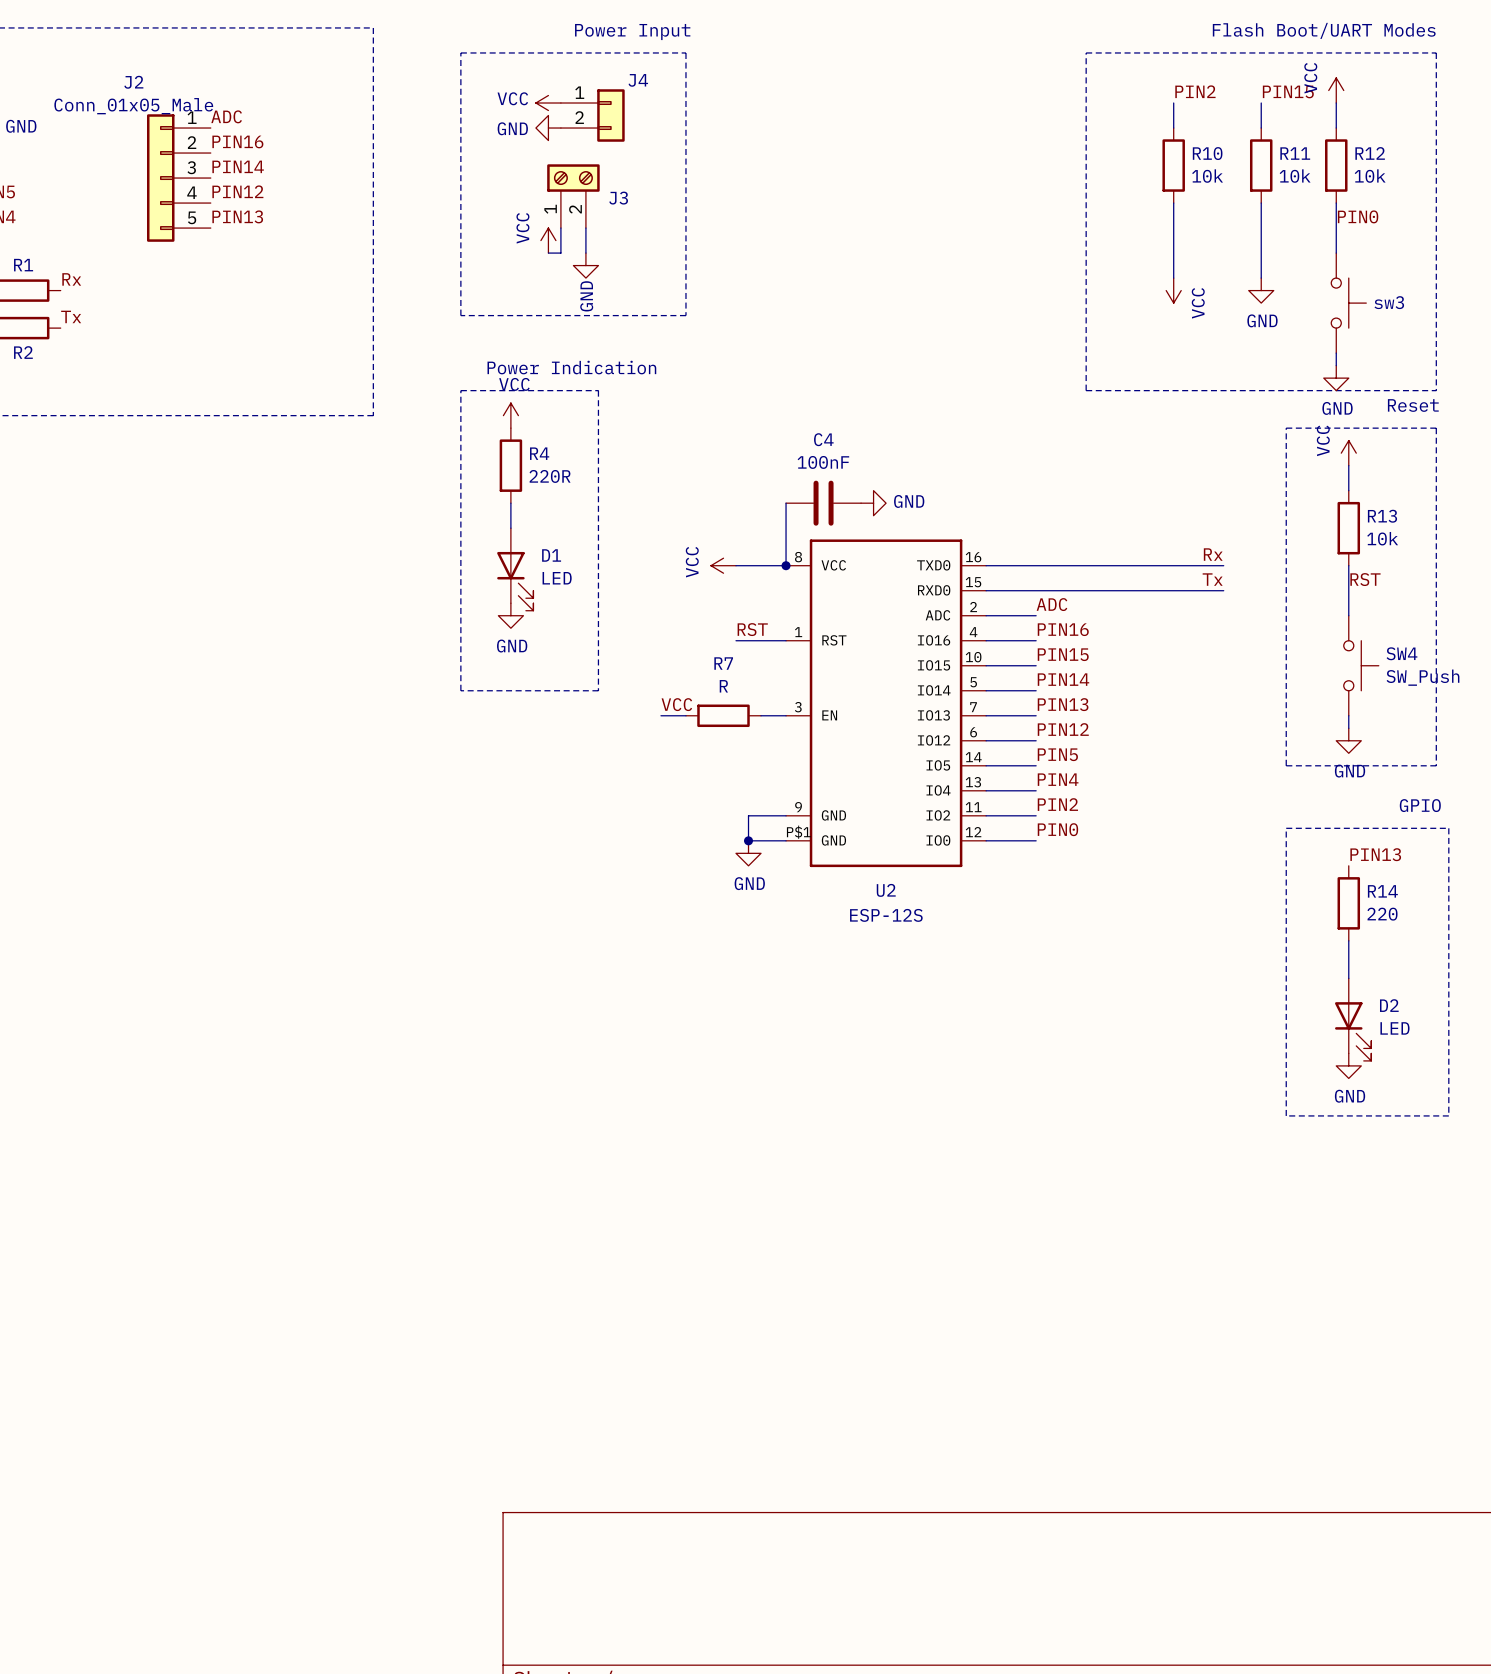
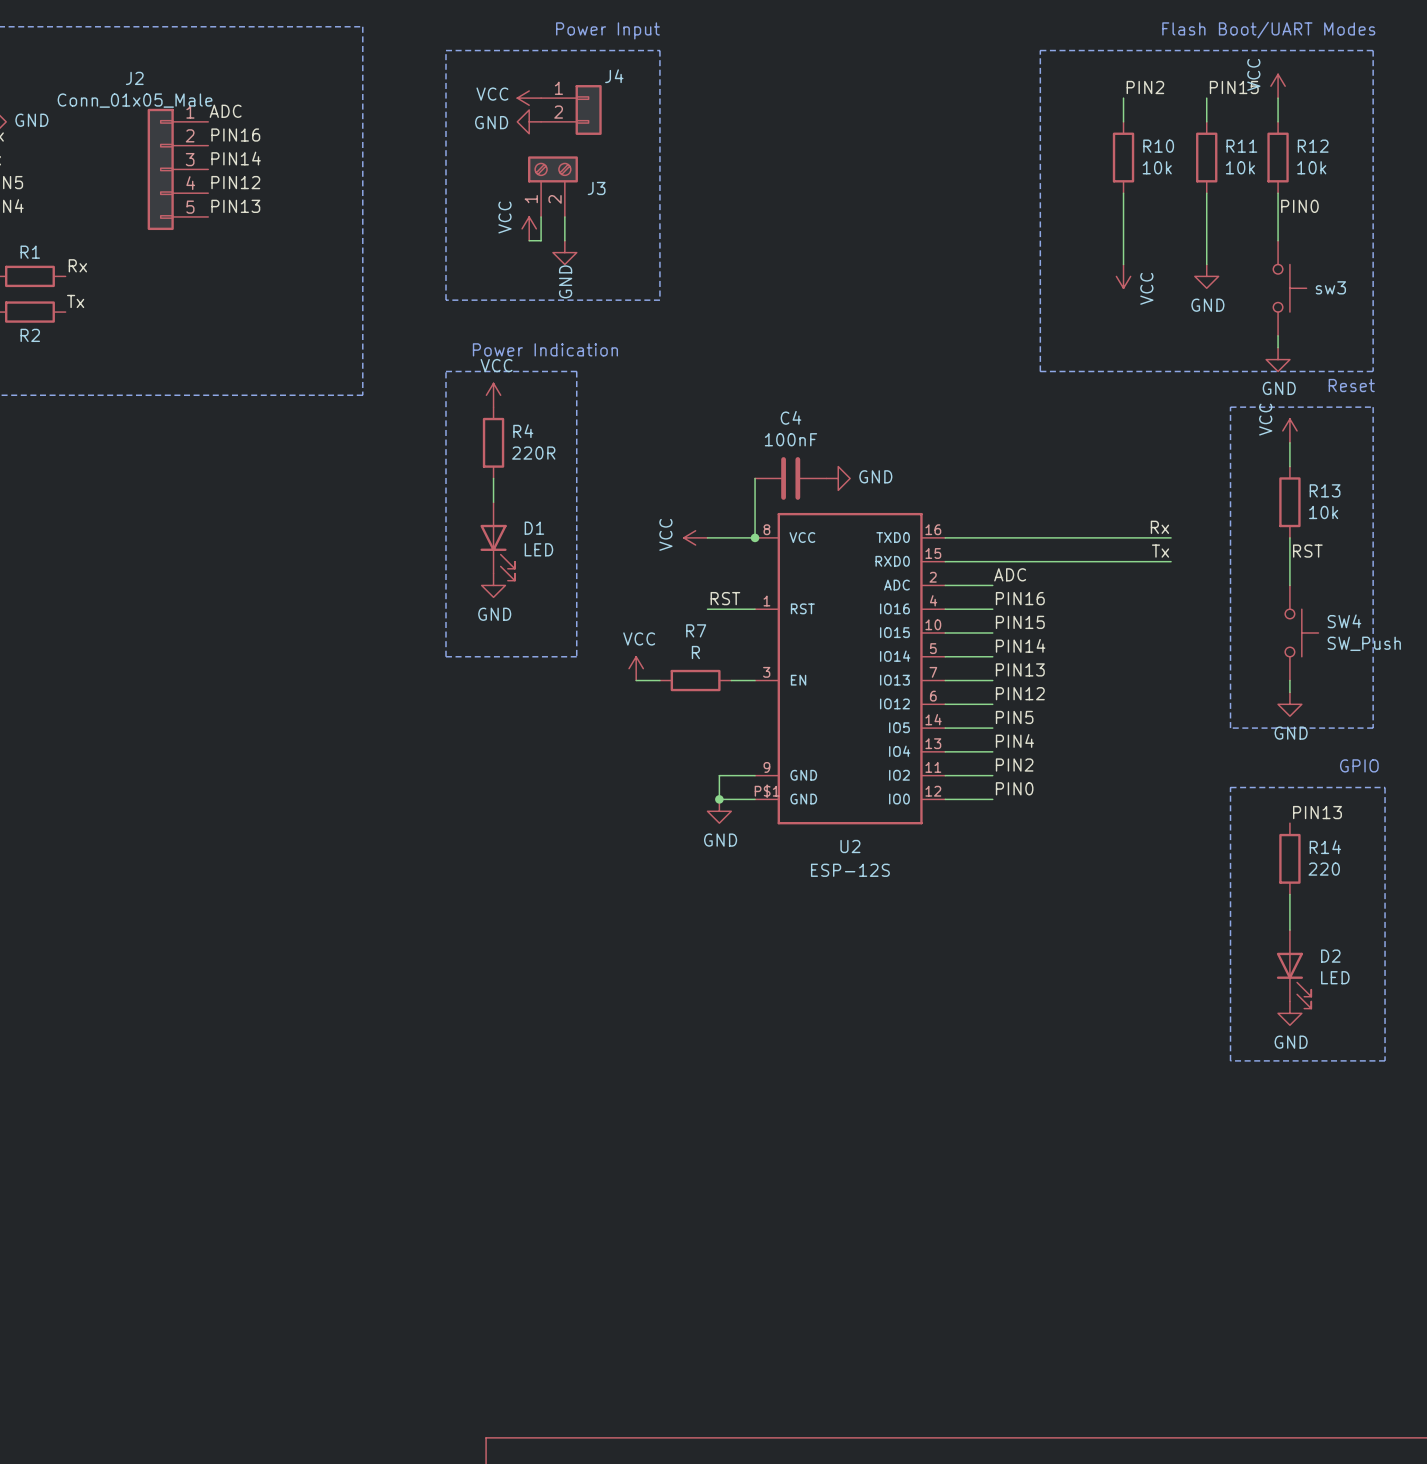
power symbol: none -> VCC (636, 668)
label: VCC (676, 704) -> none

